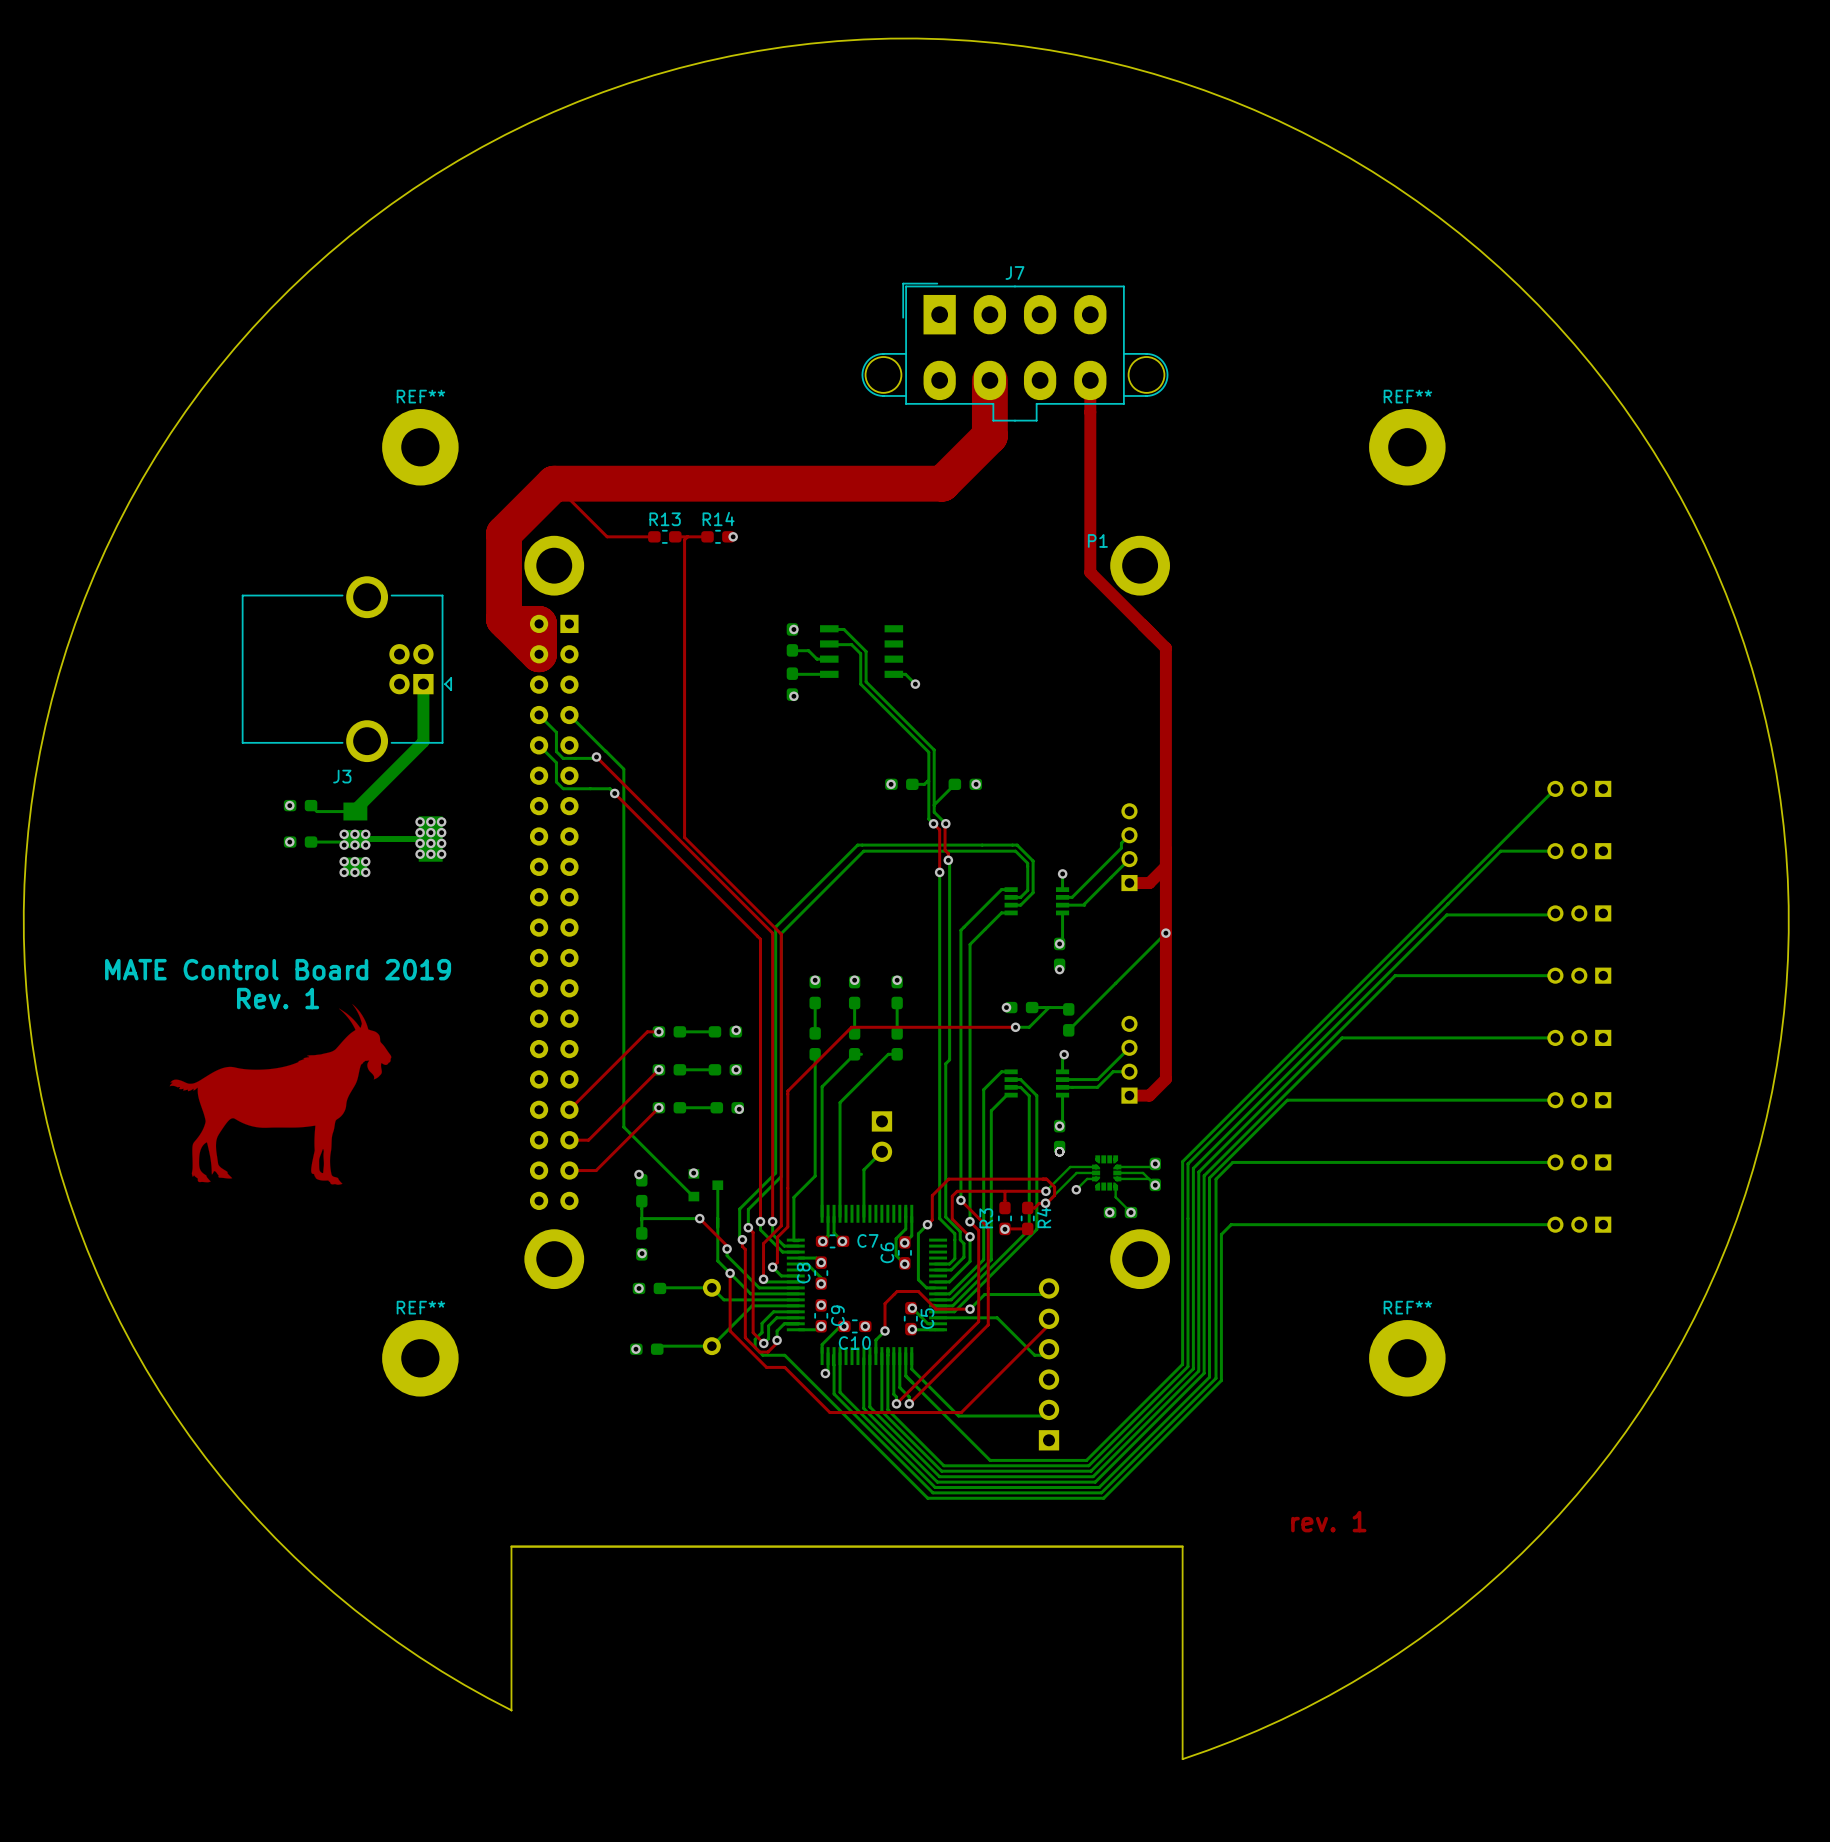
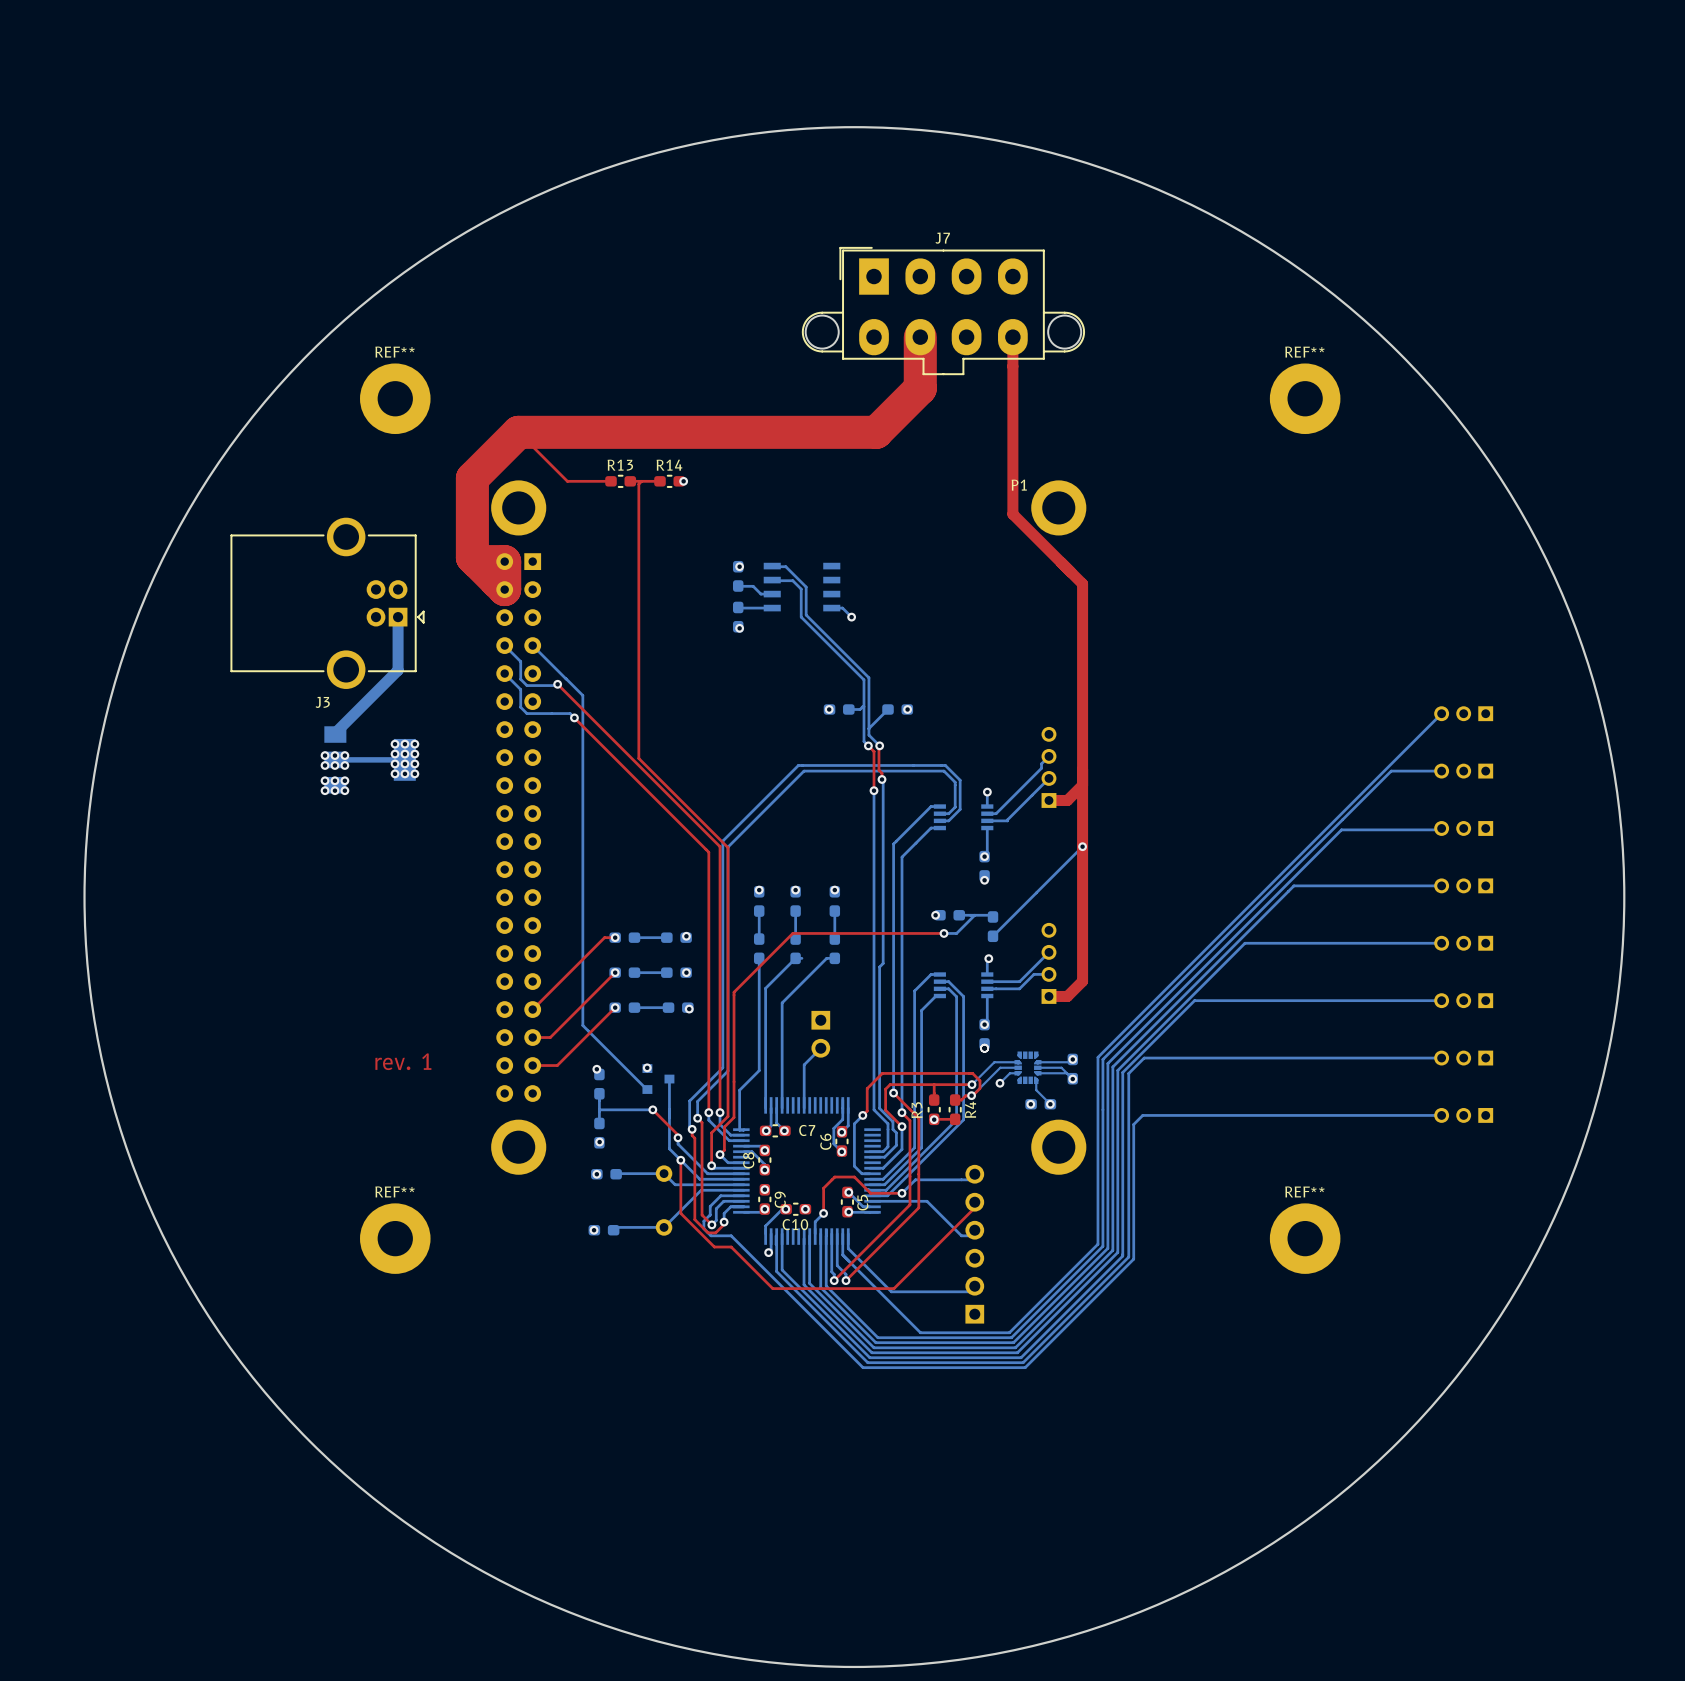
round board edge: none -> [83, 126, 1626, 1669]
via: (289, 805) -> none
part: (300, 805) -> none
bottom track: (311, 805) (317, 811) (353, 811) -> none
via: (289, 842) -> none
part: (300, 842) -> none
bottom track: (311, 842) (350, 842) -> none
text: MATE Control Board 2019 (278, 969) -> none
text: Rev. 1 (278, 998) -> none
drawing: [169, 1004, 392, 1185] -> none
text: none -> rev. 1 (403, 1061)
text: rev. 1 (1328, 1521) -> none
board edge: (511, 1710) (487, 1698) (441, 1671) (397, 1641) (354, 1609) (294, 1557) (239, 1499) (189, 1436) (159, 1392) (132, 1346) (97, 1274) (68, 1199) (47, 1122) (32, 1044) (24, 964) (23, 911) (25, 857) (35, 778) (51, 700) (66, 648) (84, 598) (117, 525) (156, 455) (185, 411) (217, 368) (270, 308) (328, 253) (391, 204) (458, 160) (505, 134) (553, 111) (628, 83) (705, 61) (757, 51) (810, 43) (890, 38) (970, 40) (1023, 46) (1075, 54) (1153, 73) (1229, 99) (1302, 132) (1372, 171) (1438, 216) (1479, 250) (1519, 286) (1574, 344) (1623, 407) (1667, 474) (1704, 544) (1725, 593) (1744, 643) (1759, 694) (1771, 746) (1783, 826) (1788, 905) (1786, 985) (1776, 1065) (1760, 1143) (1745, 1194) (1727, 1244) (1694, 1317) (1669, 1364) (1640, 1410) (1593, 1474) (1540, 1534) (1482, 1589) (1441, 1623) (1397, 1654) (1329, 1695) (1257, 1730) (1182, 1759) (1182, 1546) (511, 1546) (511, 1710) -> none

